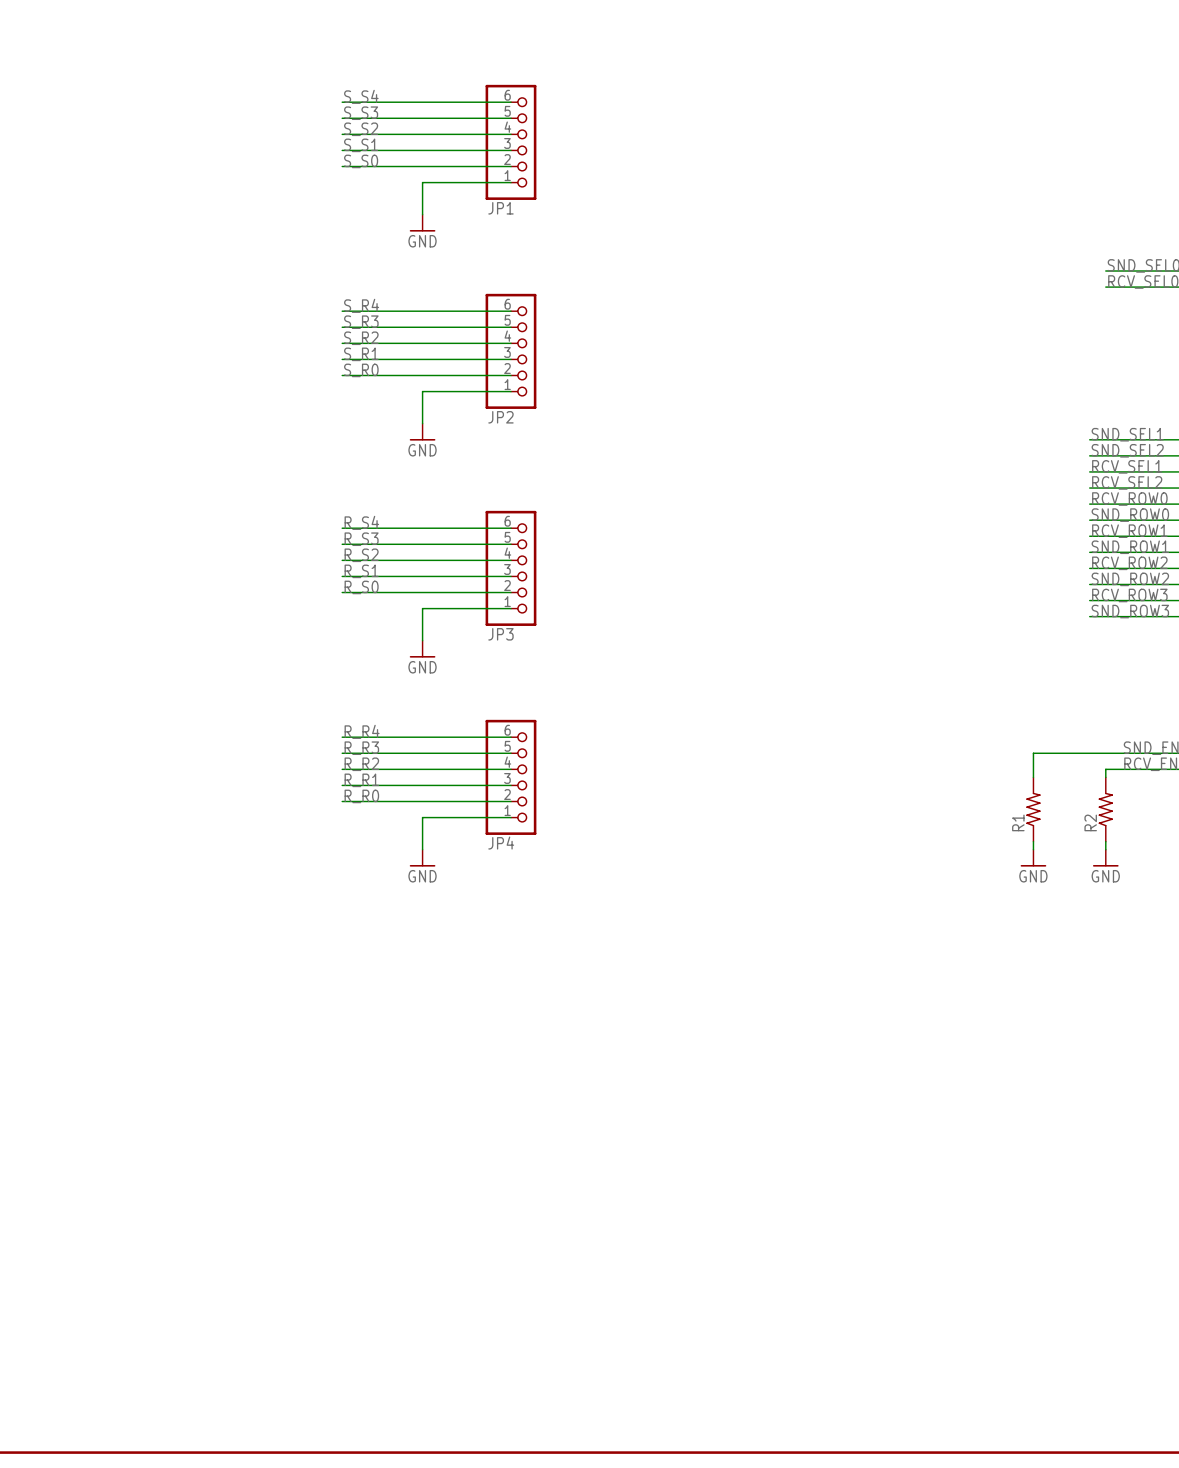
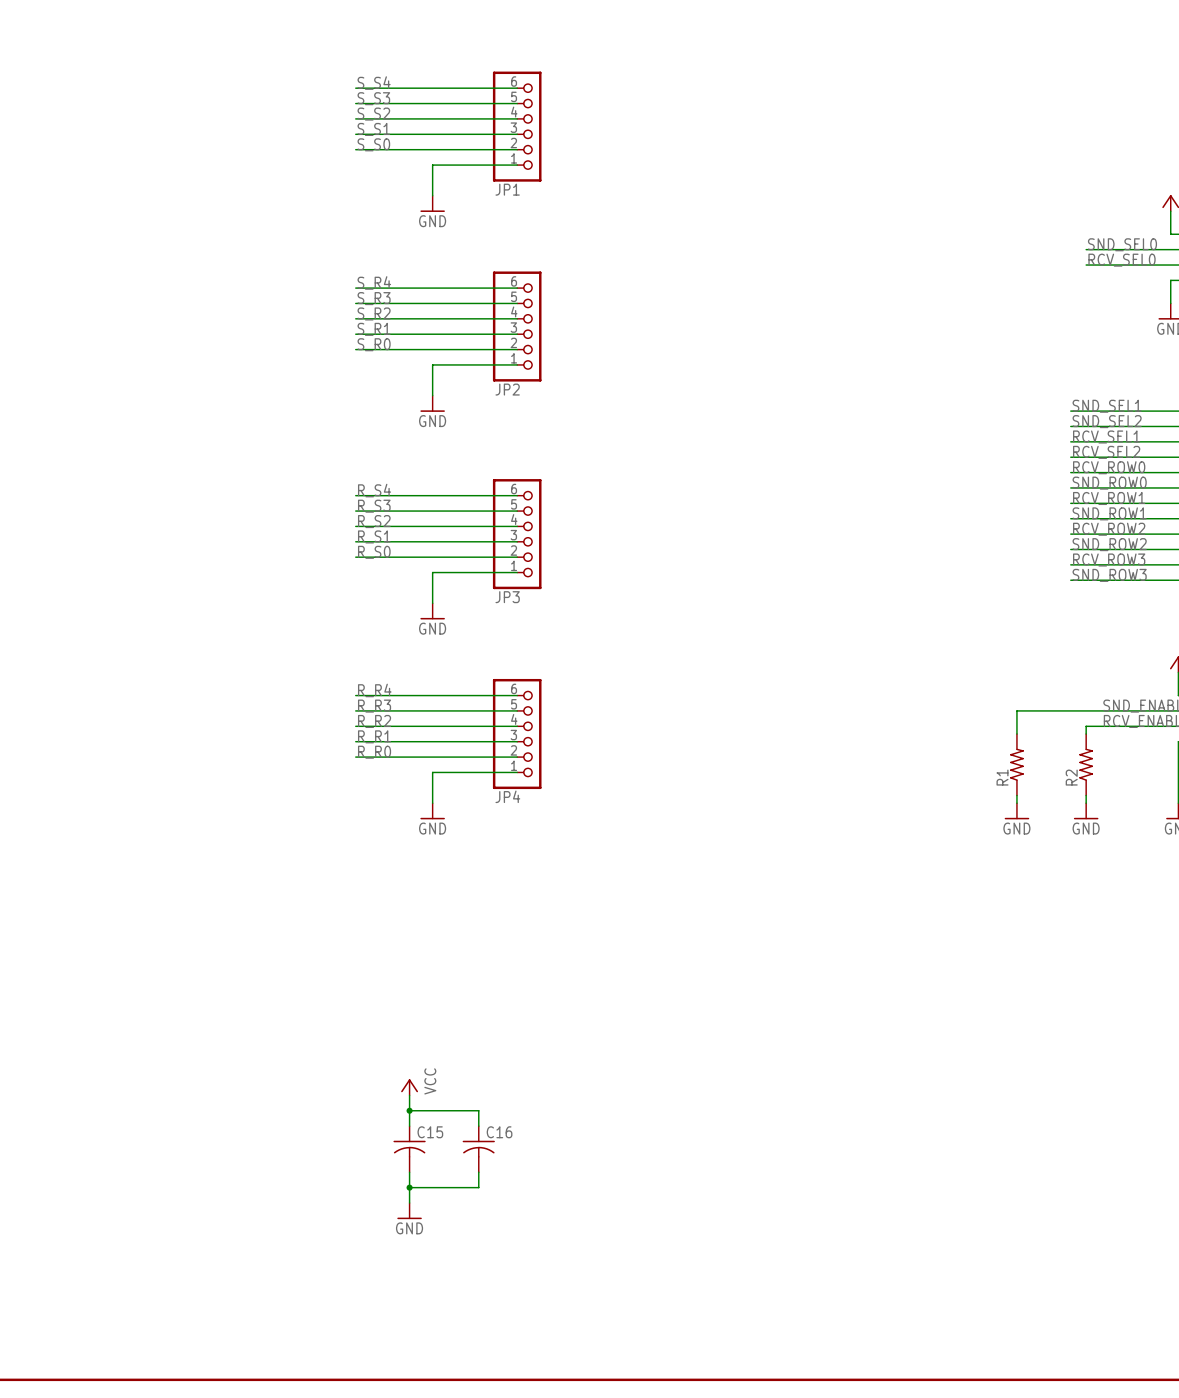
power symbol: none -> VCC (409, 1087)
wire: none -> (409, 1095) (409, 1126)
wire: none -> (409, 1110) (478, 1110) (478, 1126)
junction: none -> (409, 1110)
C15: none -> (409, 1149)
C16: none -> (478, 1149)
wire: none -> (409, 1172) (409, 1203)
wire: none -> (478, 1172) (478, 1187) (409, 1187)
junction: none -> (409, 1187)
power symbol: none -> GND (409, 1211)

